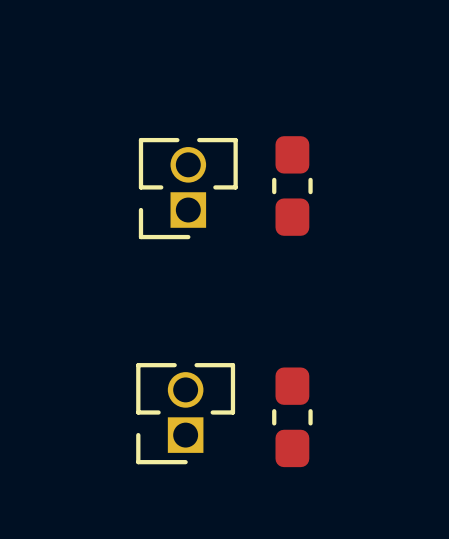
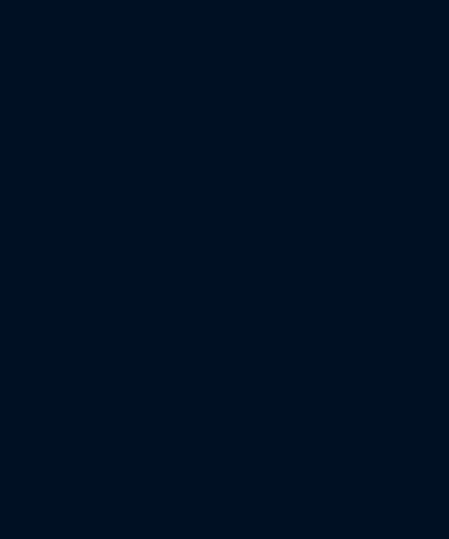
part: (292, 186) -> none
part: (188, 188) -> none
part: (185, 413) -> none
part: (292, 417) -> none

